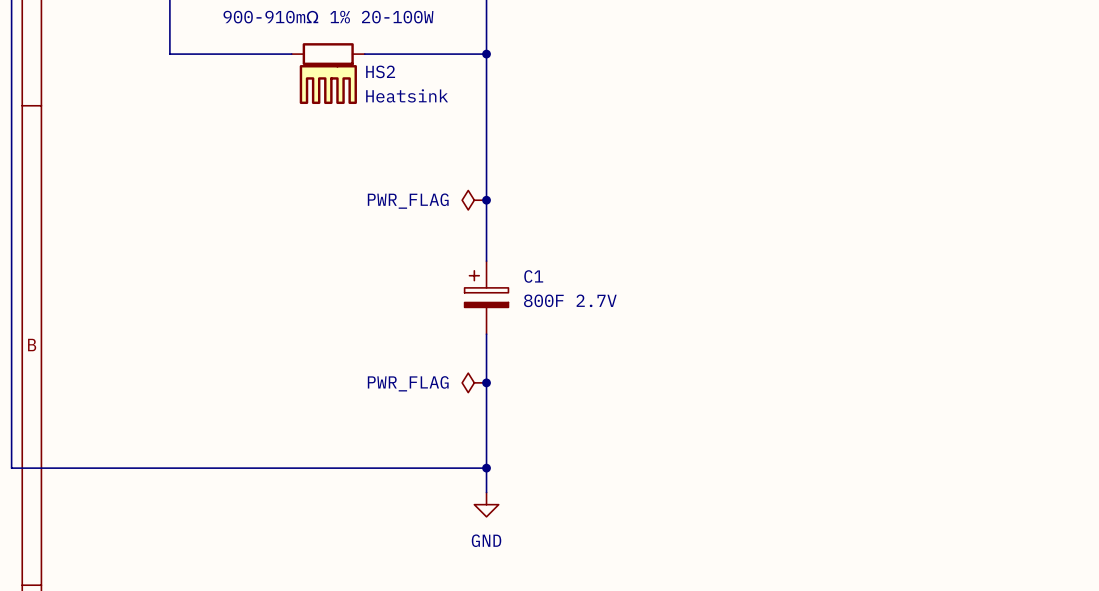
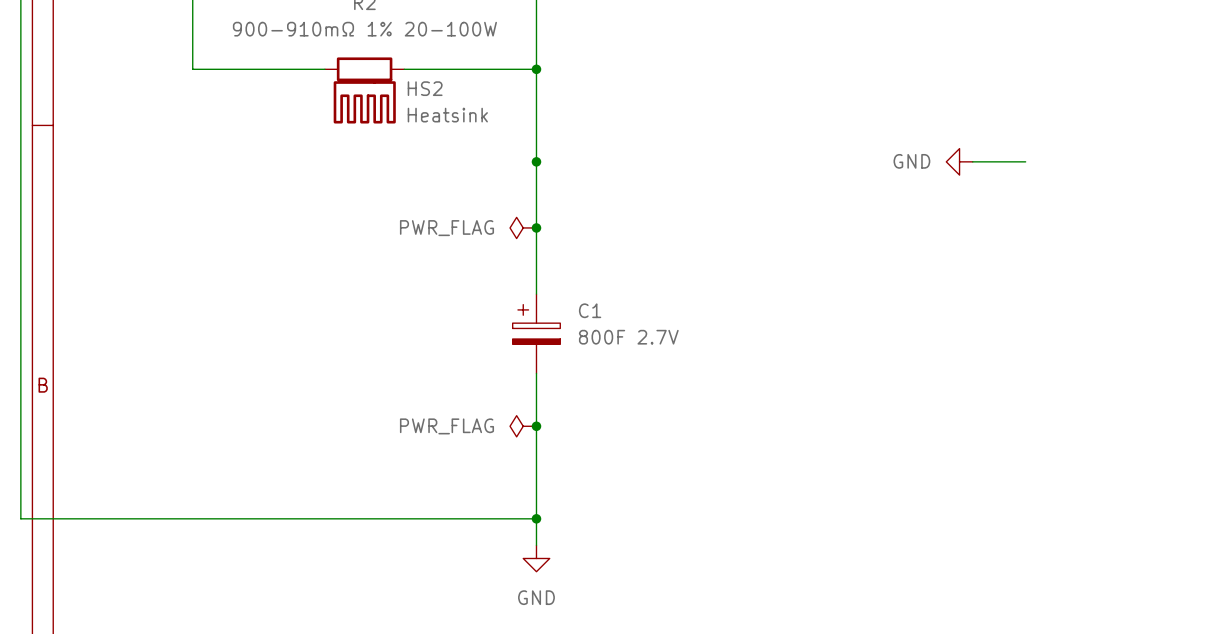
junction: none -> (536, 161)
power symbol: none -> GND (959, 161)
wire: none -> (972, 161) (1025, 161)

